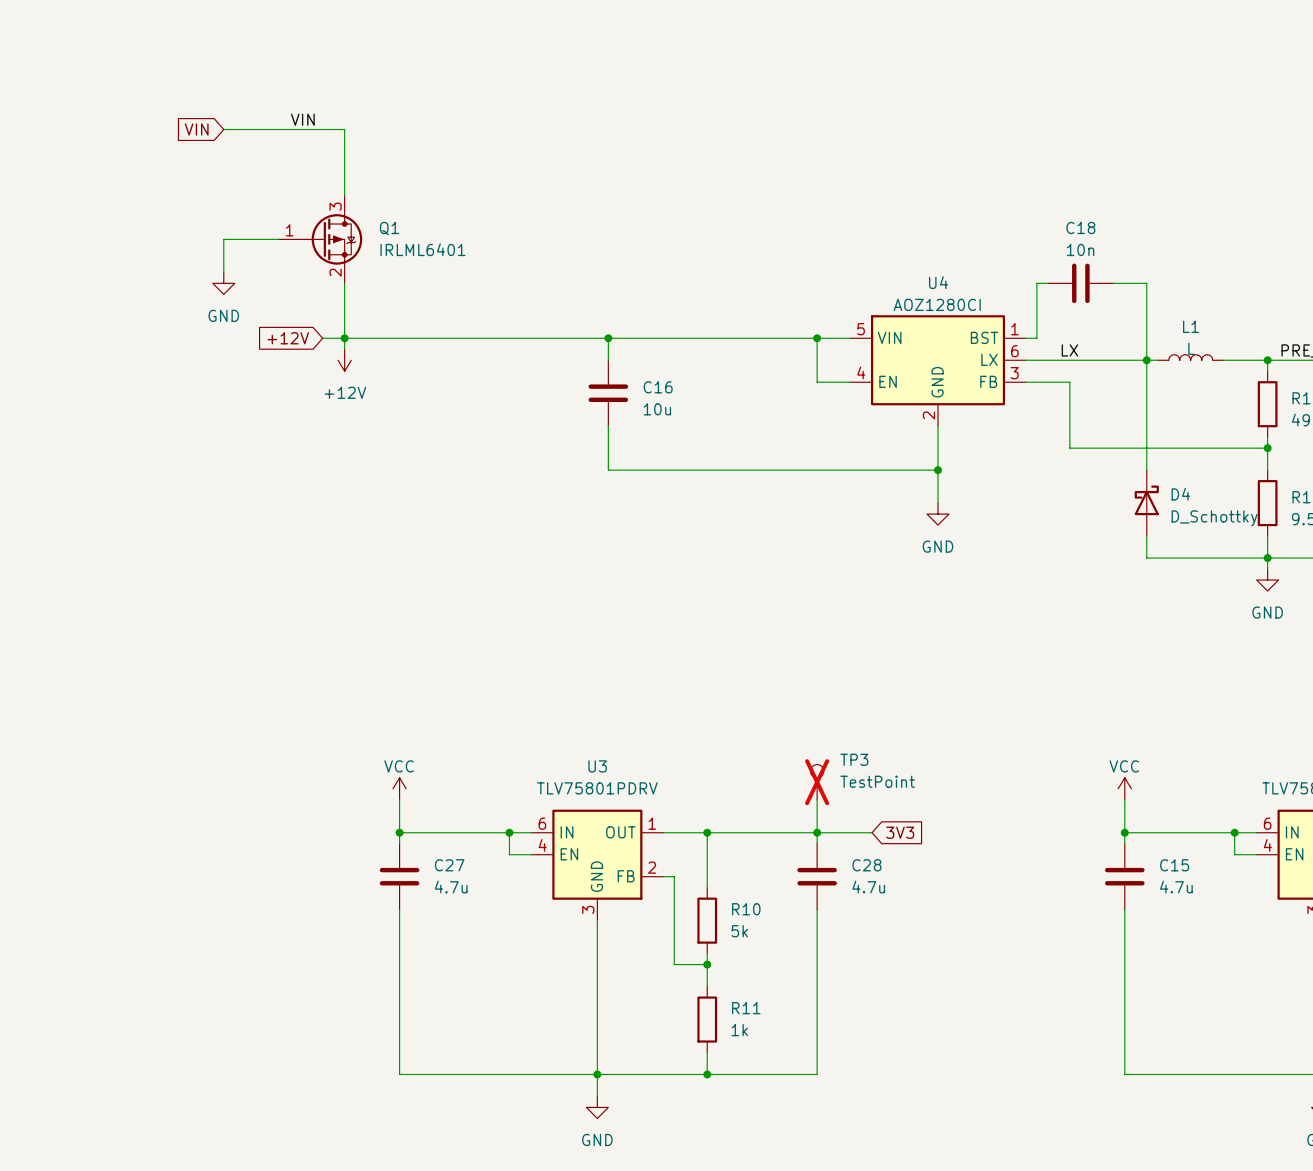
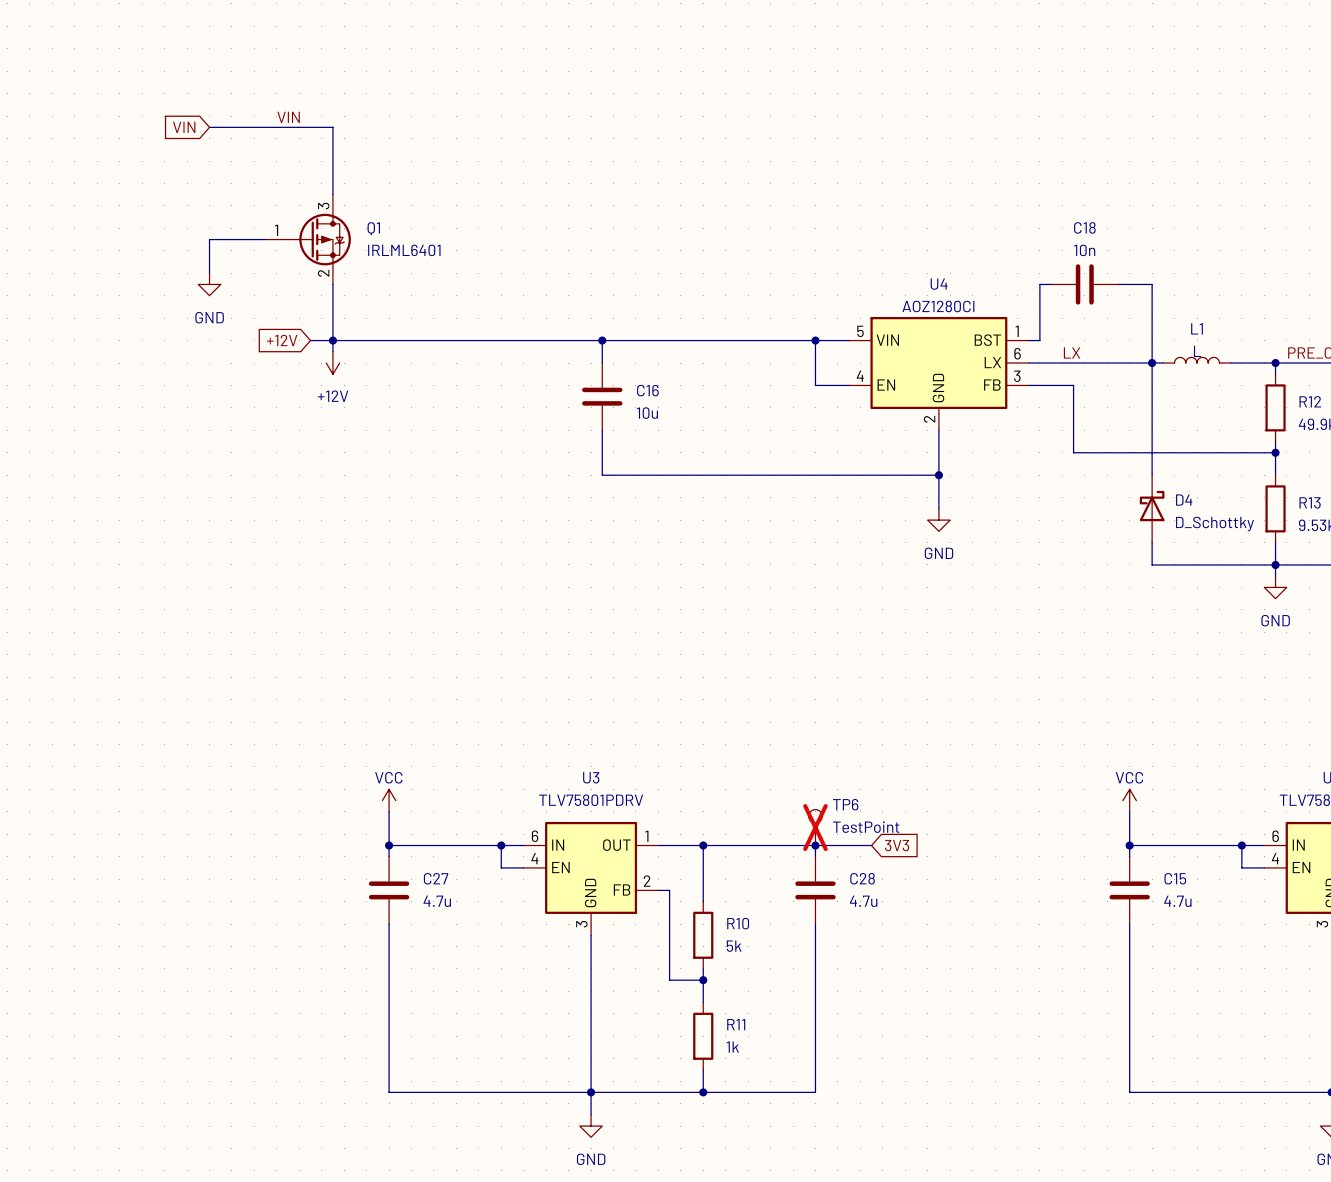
TP3: TestPoint (817, 782) -> none
TP6: none -> TestPoint (815, 827)

